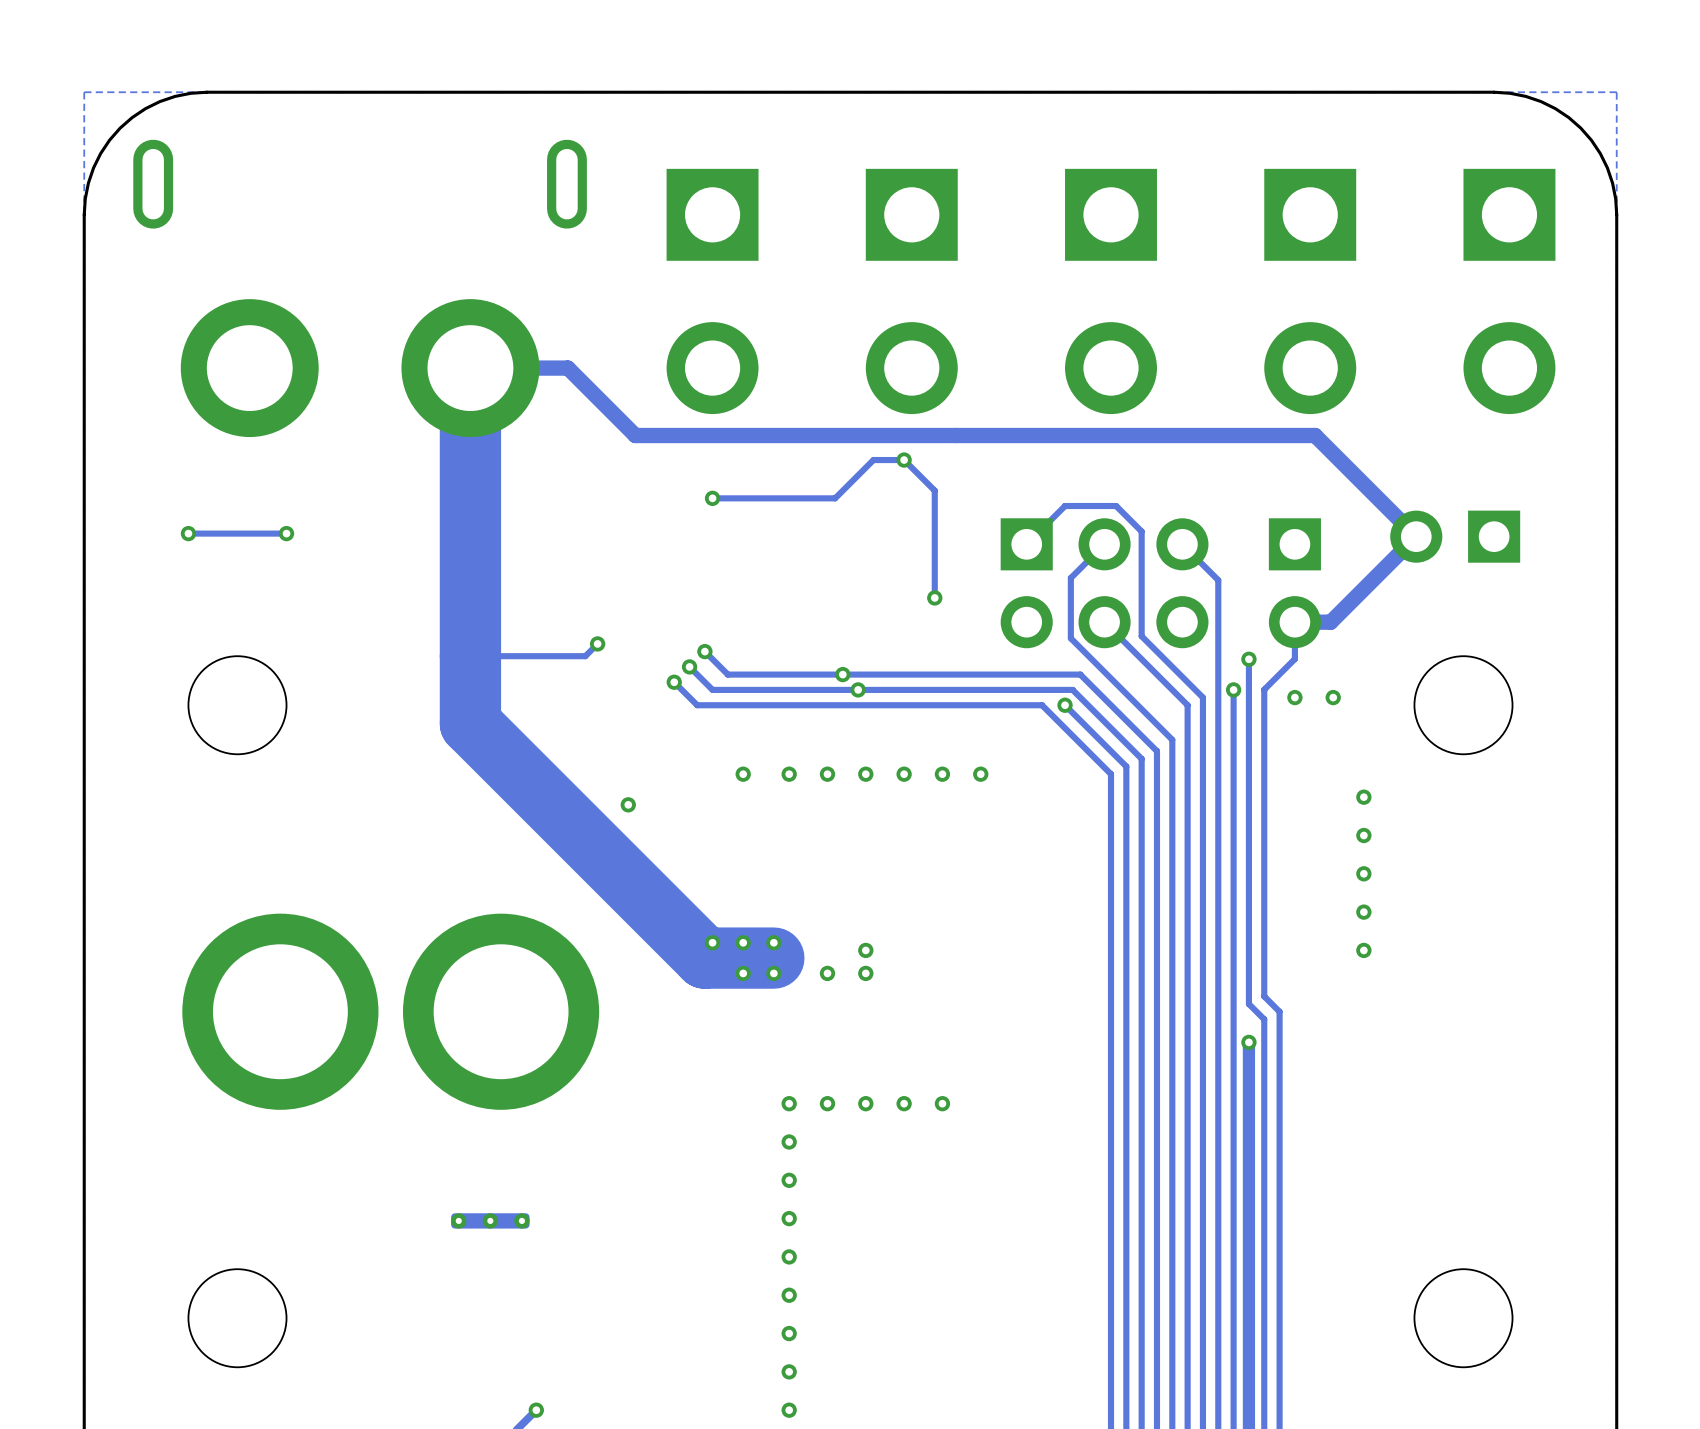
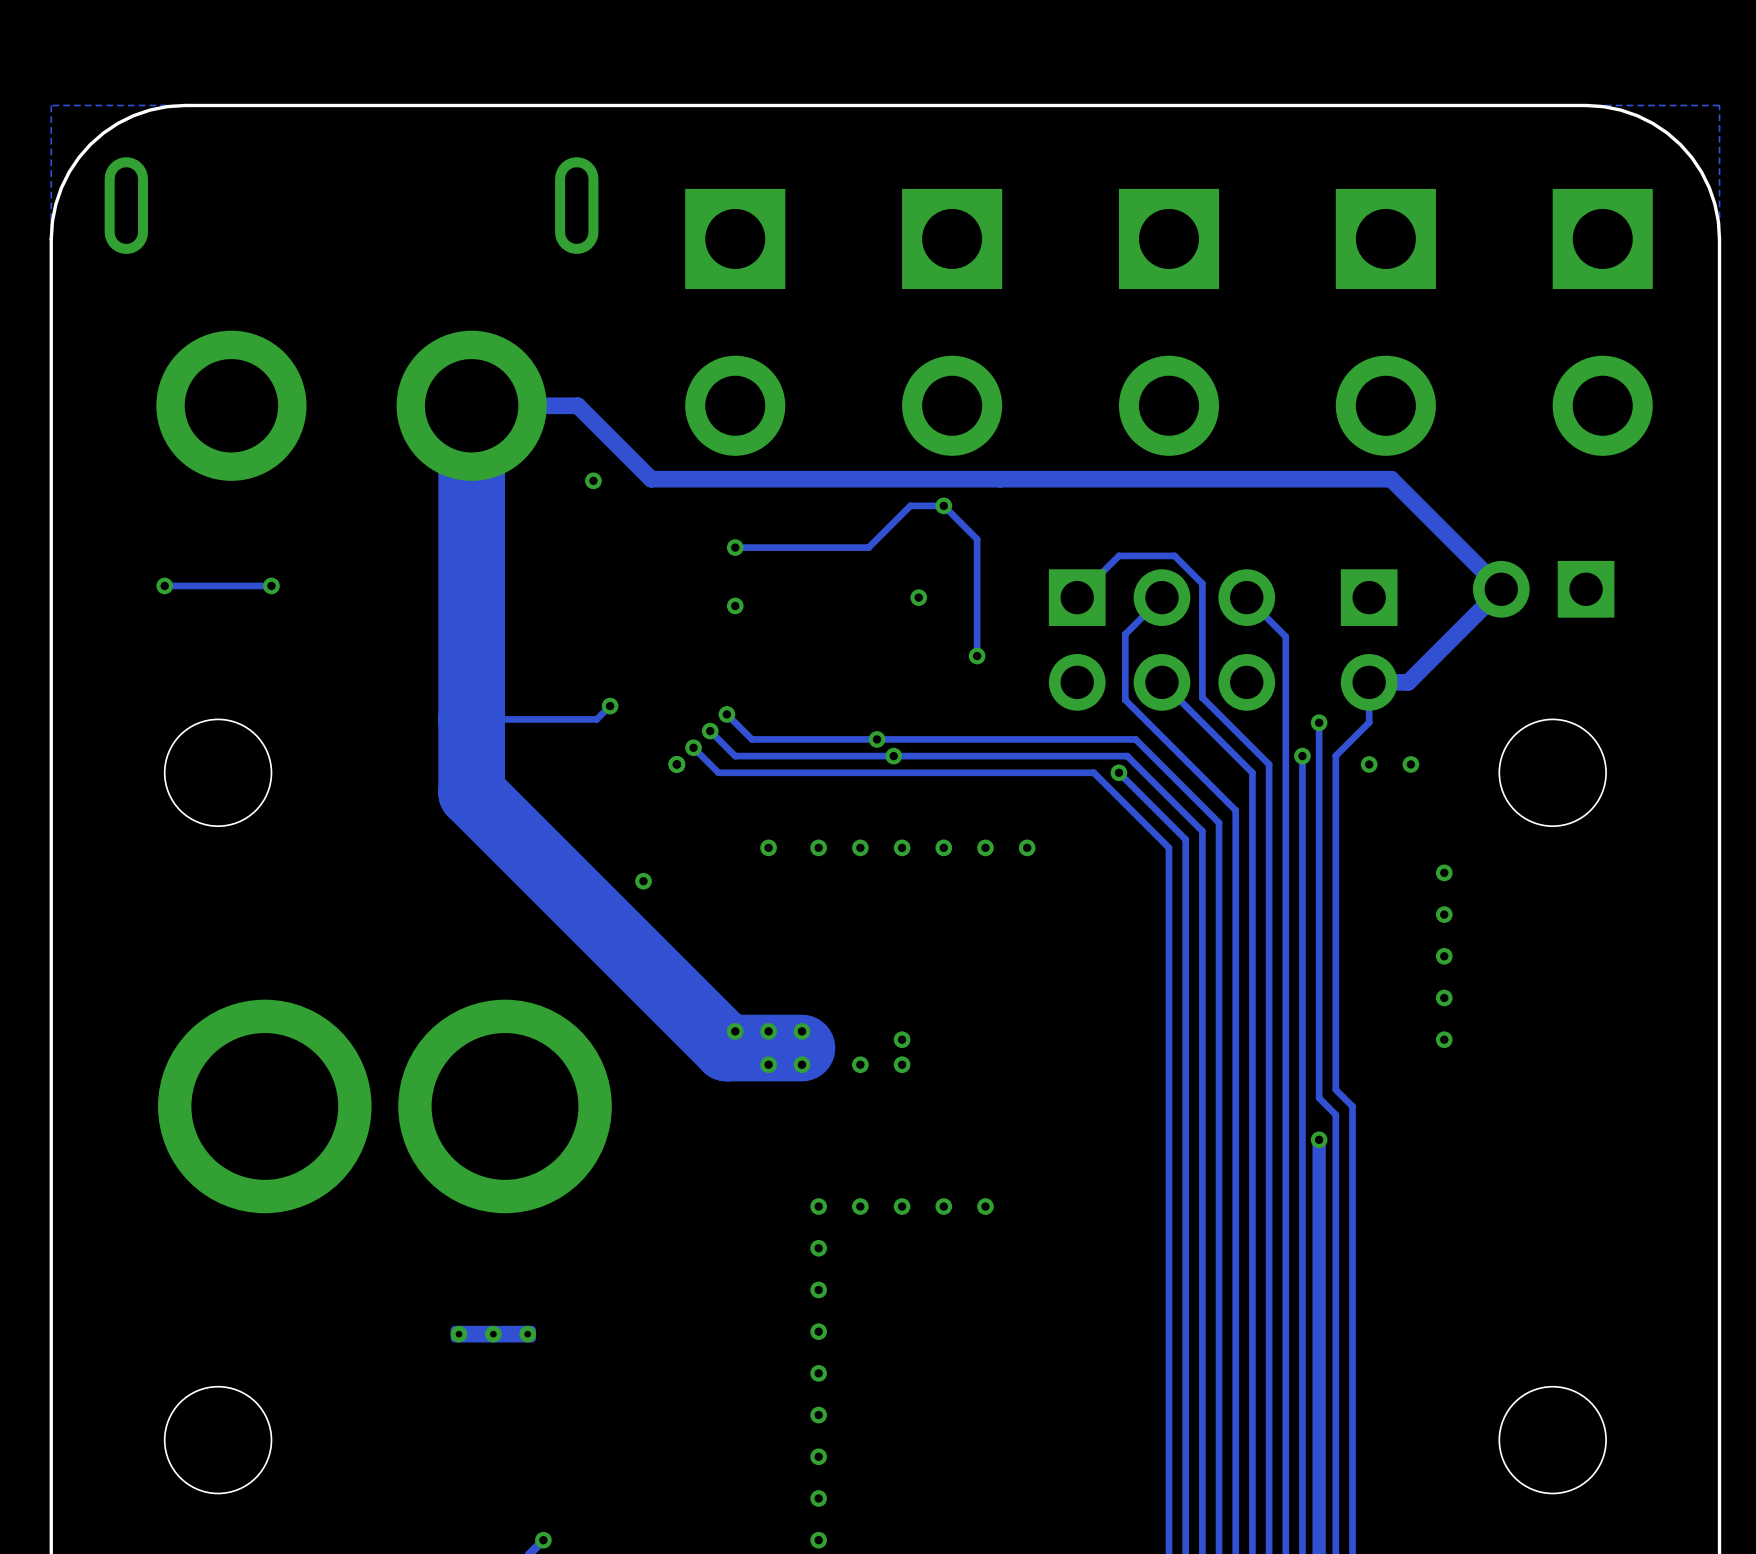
via: none -> (593, 480)
via: none -> (918, 597)
via: none -> (735, 605)
via: none -> (676, 764)

